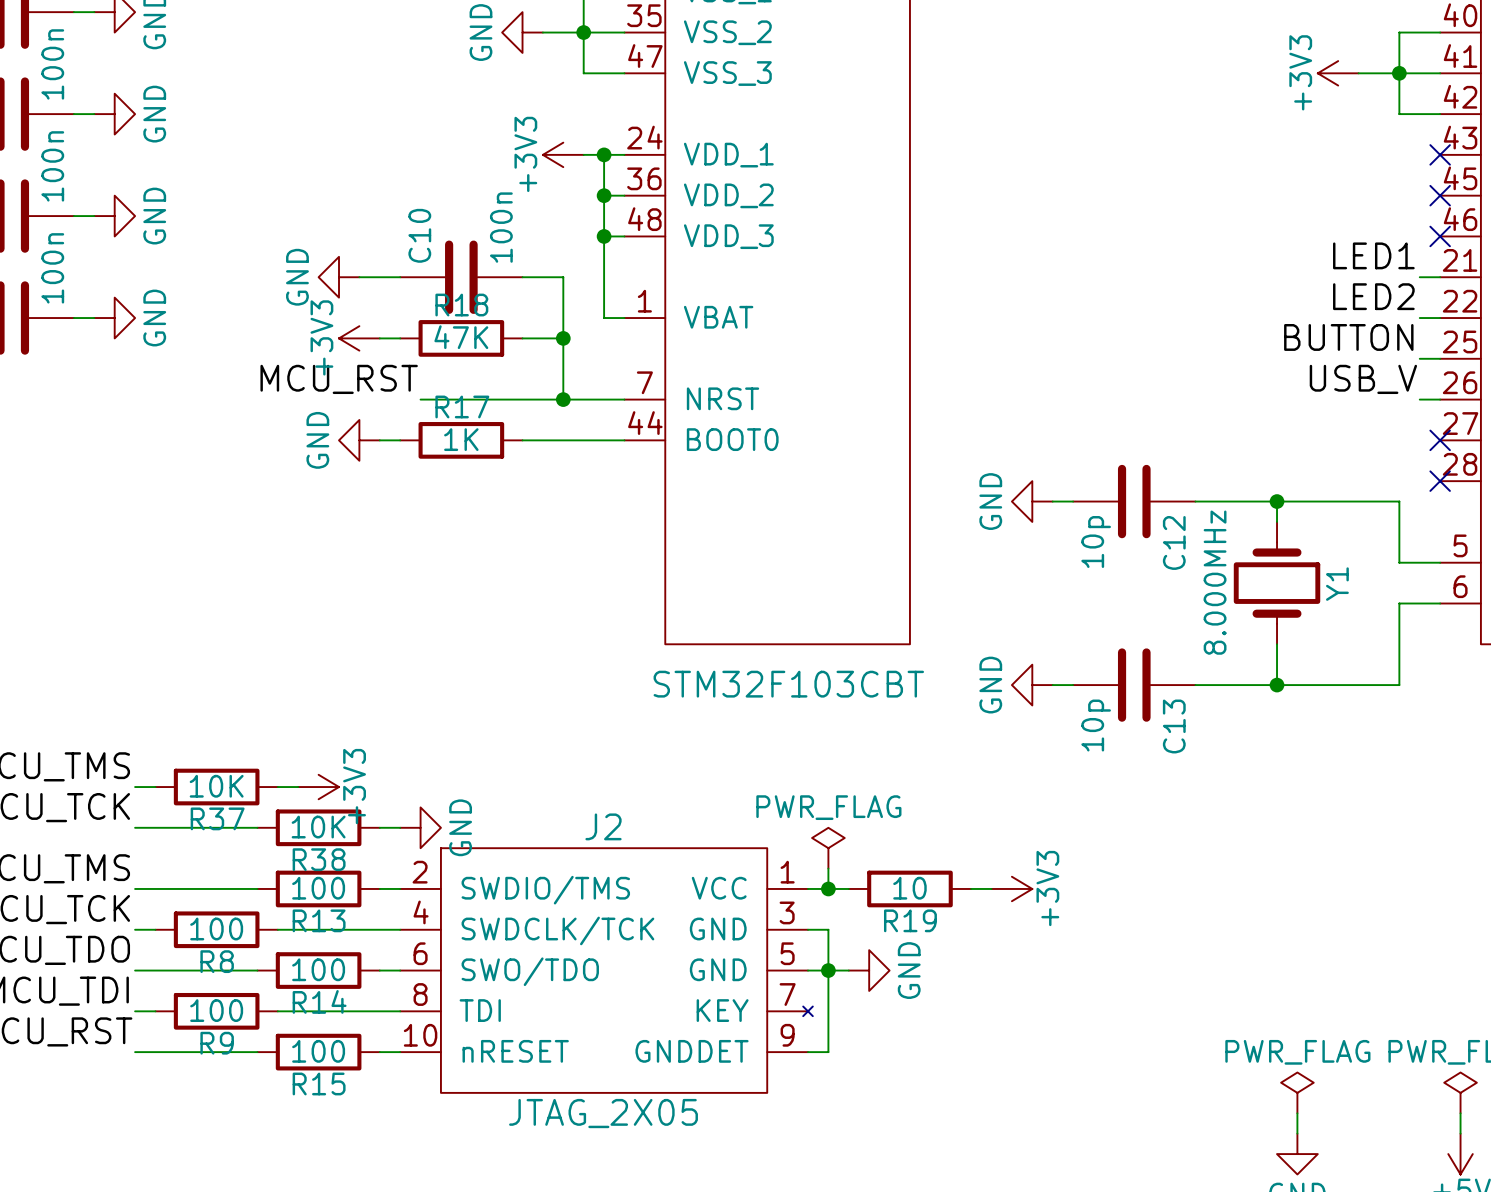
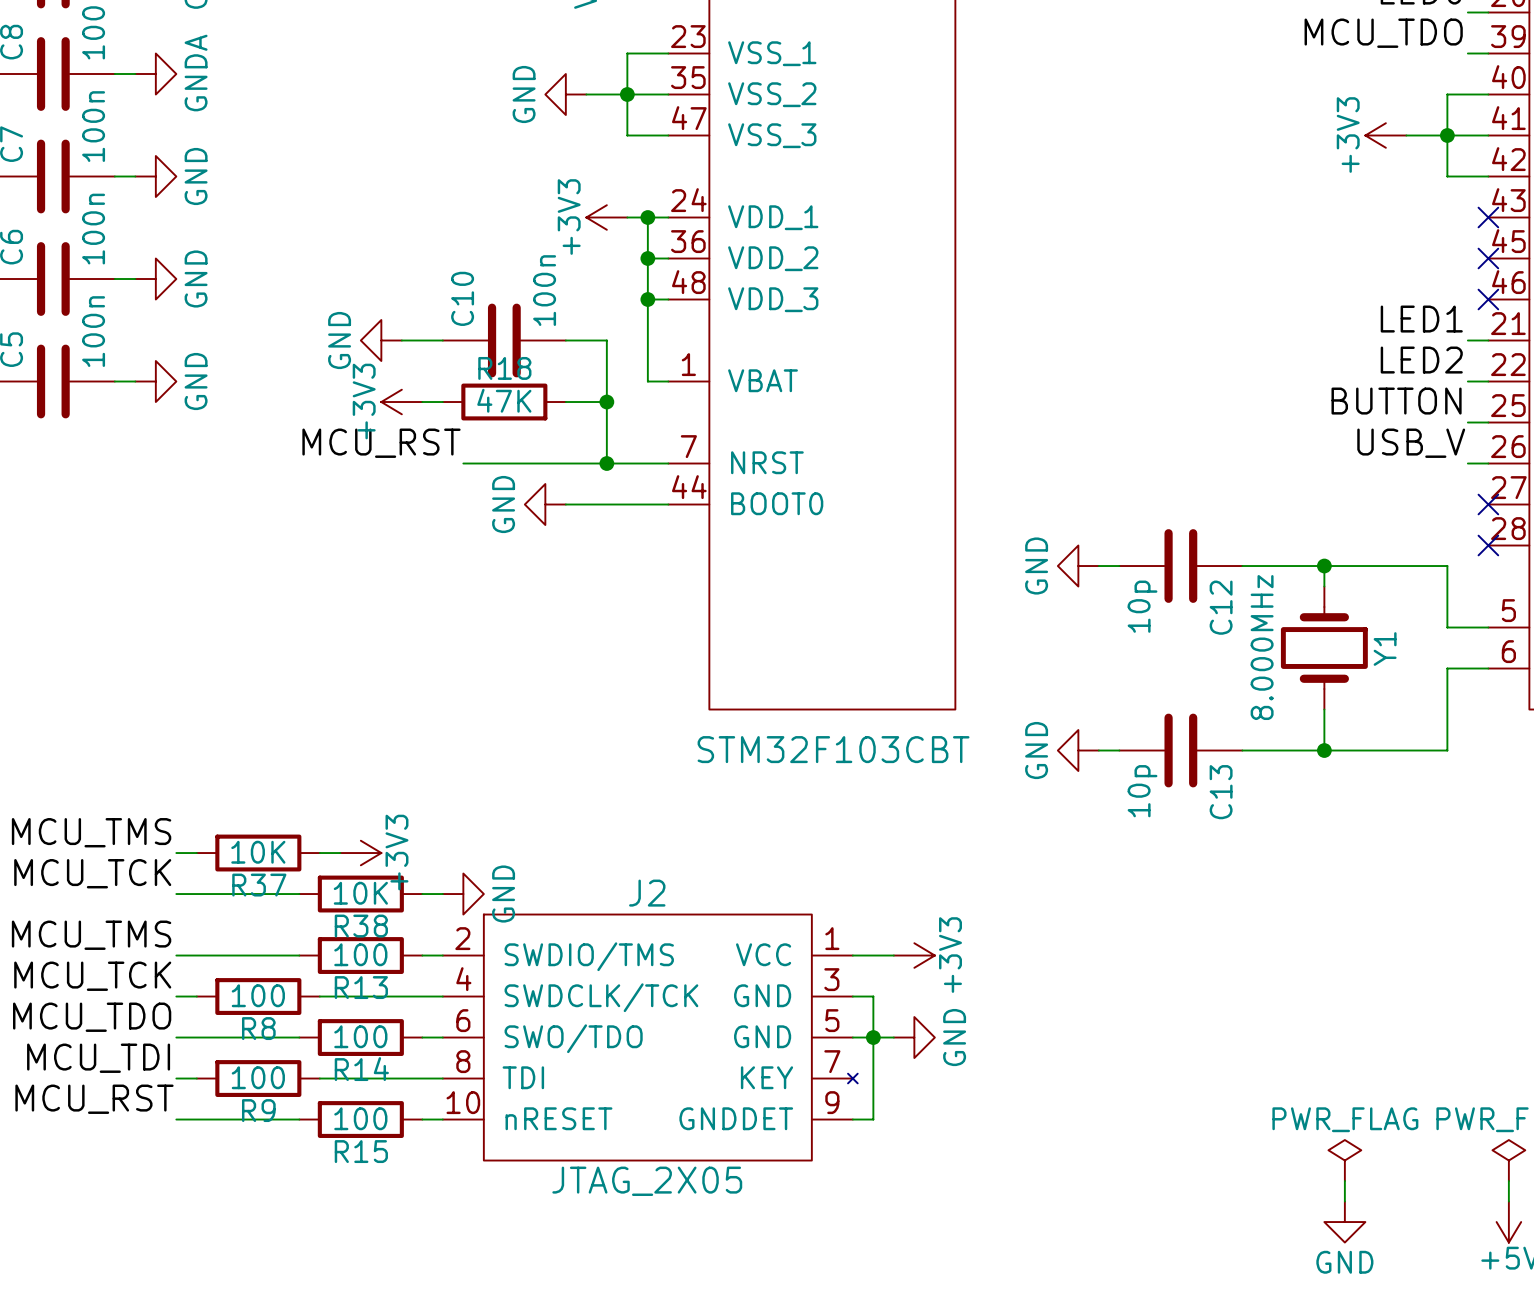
power symbol position: GND (359, 440) -> GND (545, 504)
wire: (379, 440) (400, 440) -> none
R17: 1K (461, 440) -> none
power symbol: PWR_FLAG (828, 848) -> none
wire: (828, 868) (828, 888) -> none
junction: (828, 888) -> none
R19: 10 (909, 888) -> none
wire: (971, 888) (991, 888) -> none
power symbol position: +3V3 (1011, 888) -> +3V3 (914, 955)

